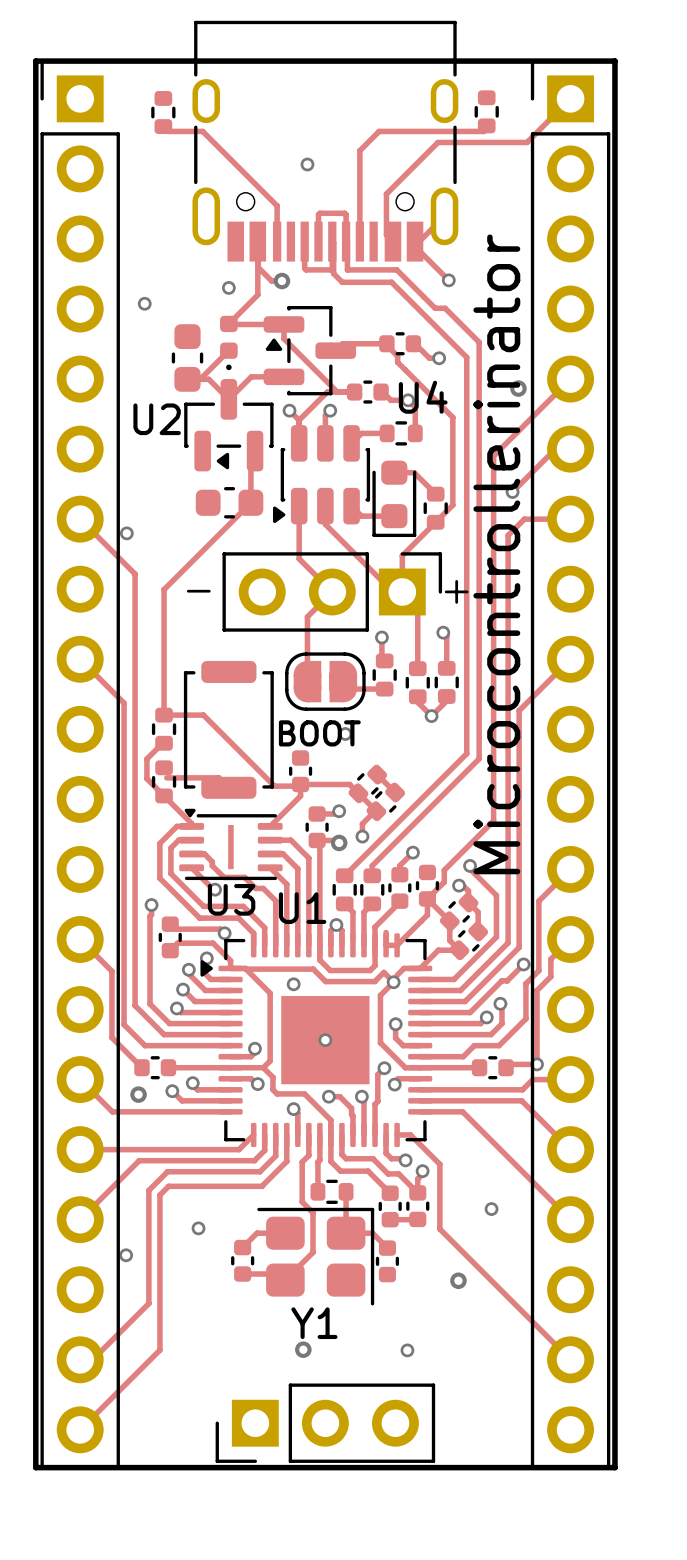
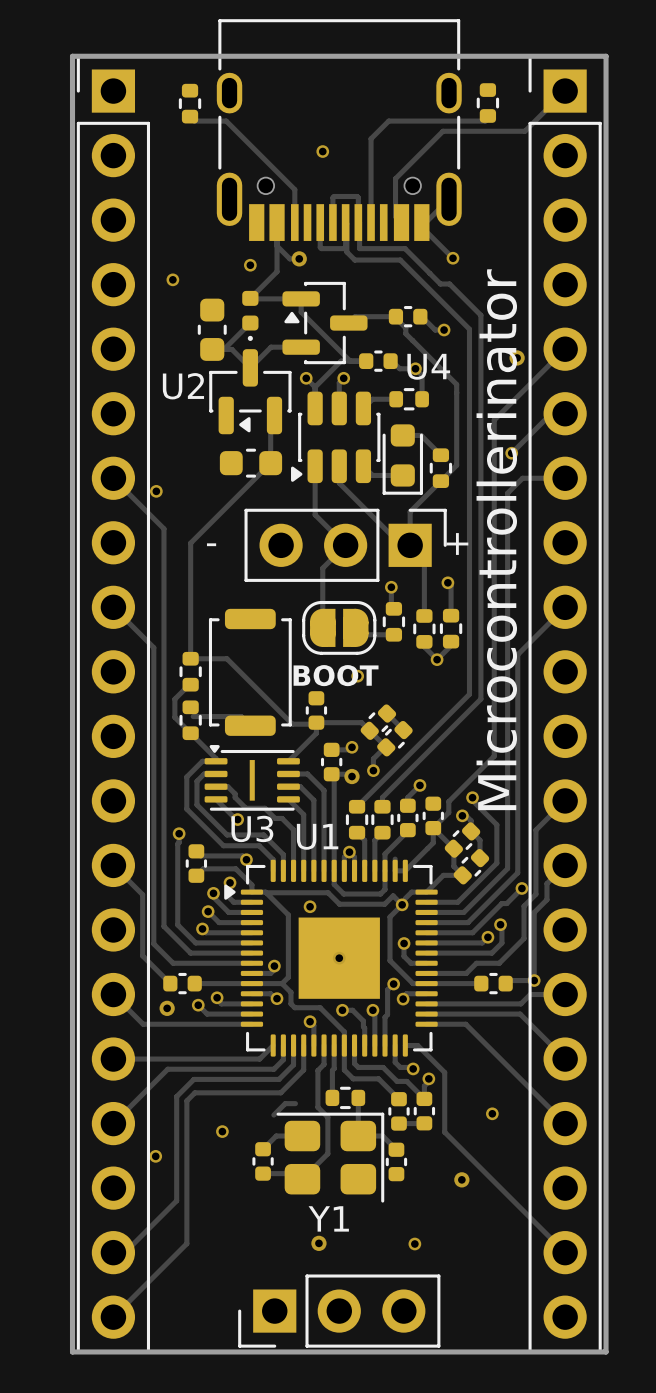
track: none -> (295, 1103) (285, 1103) (273, 1115)

